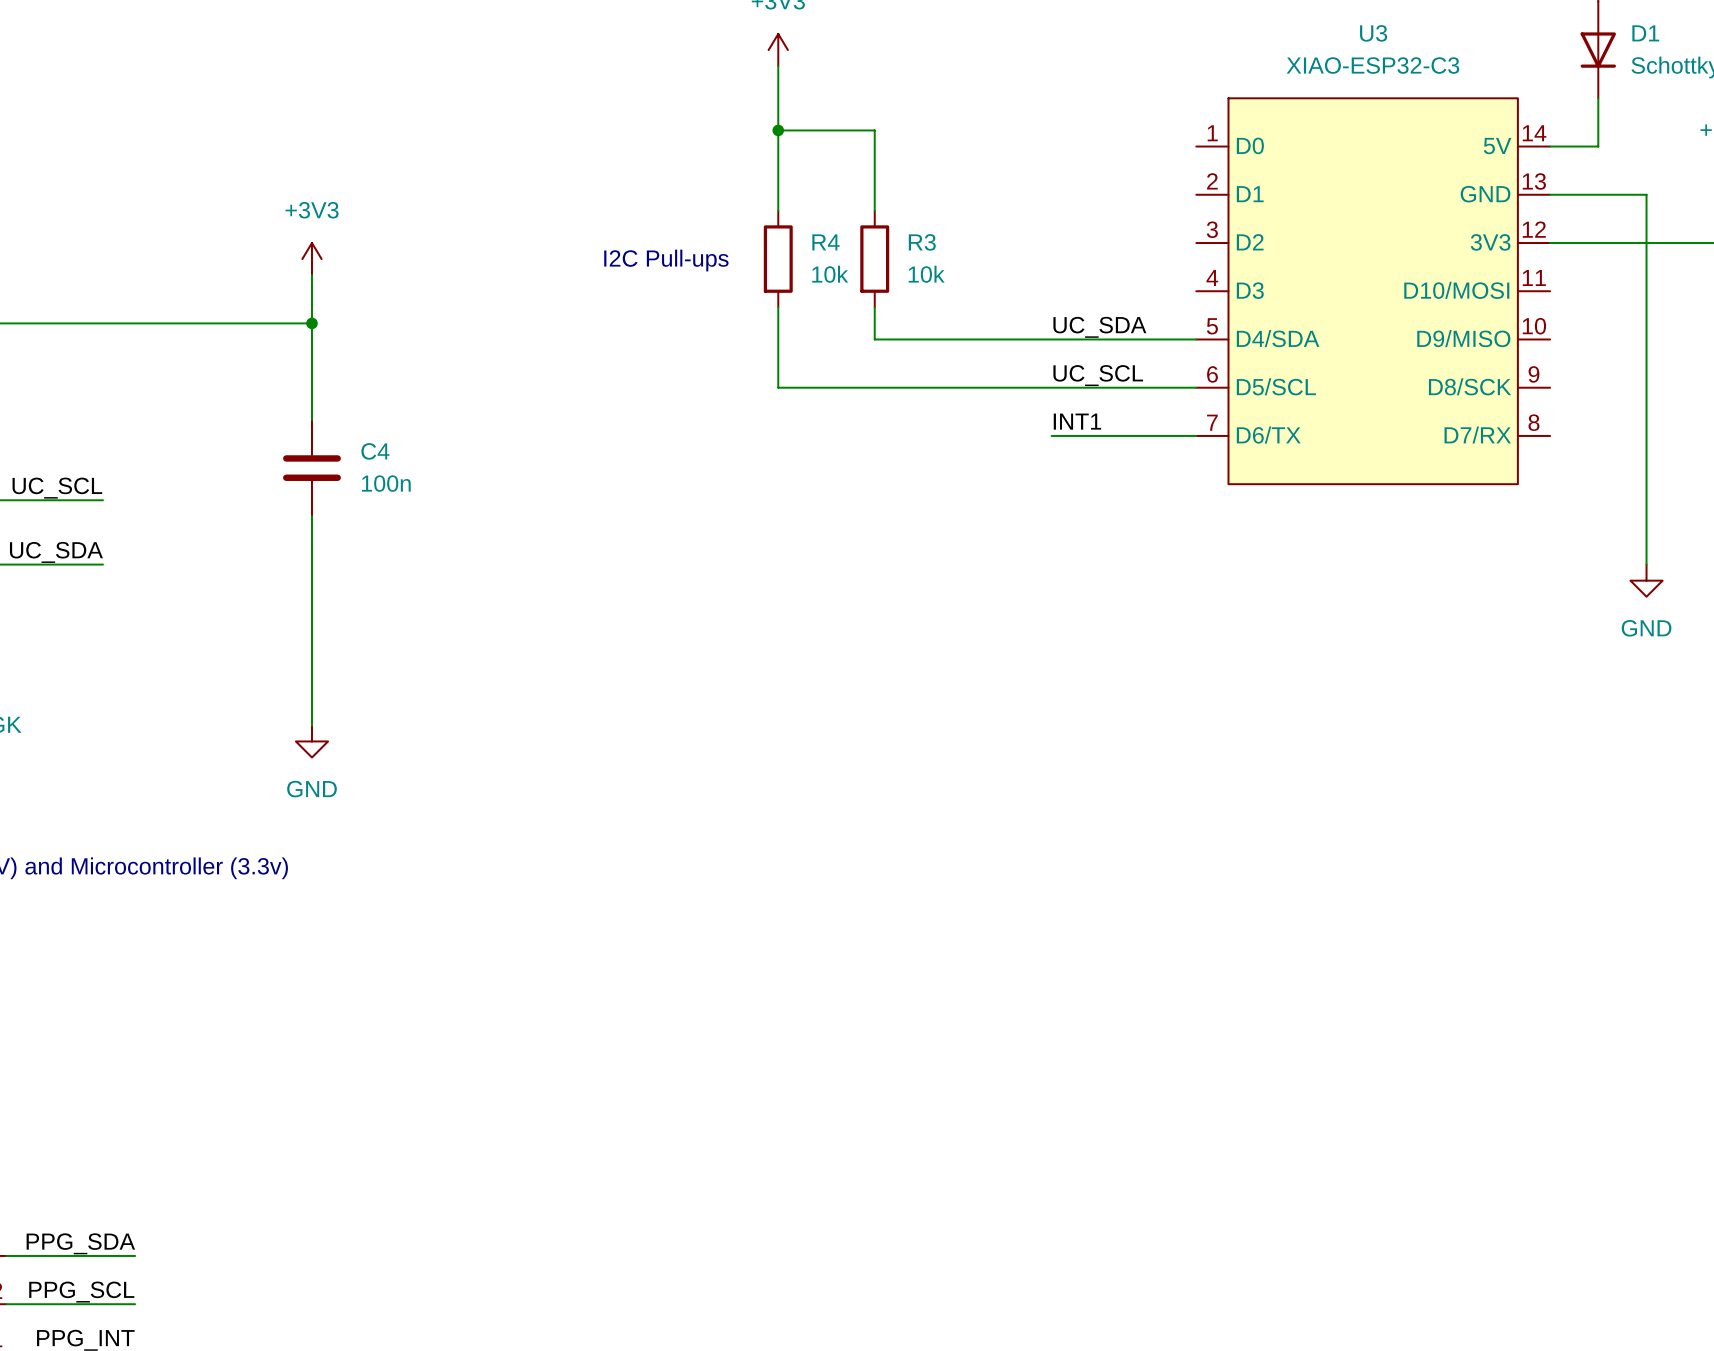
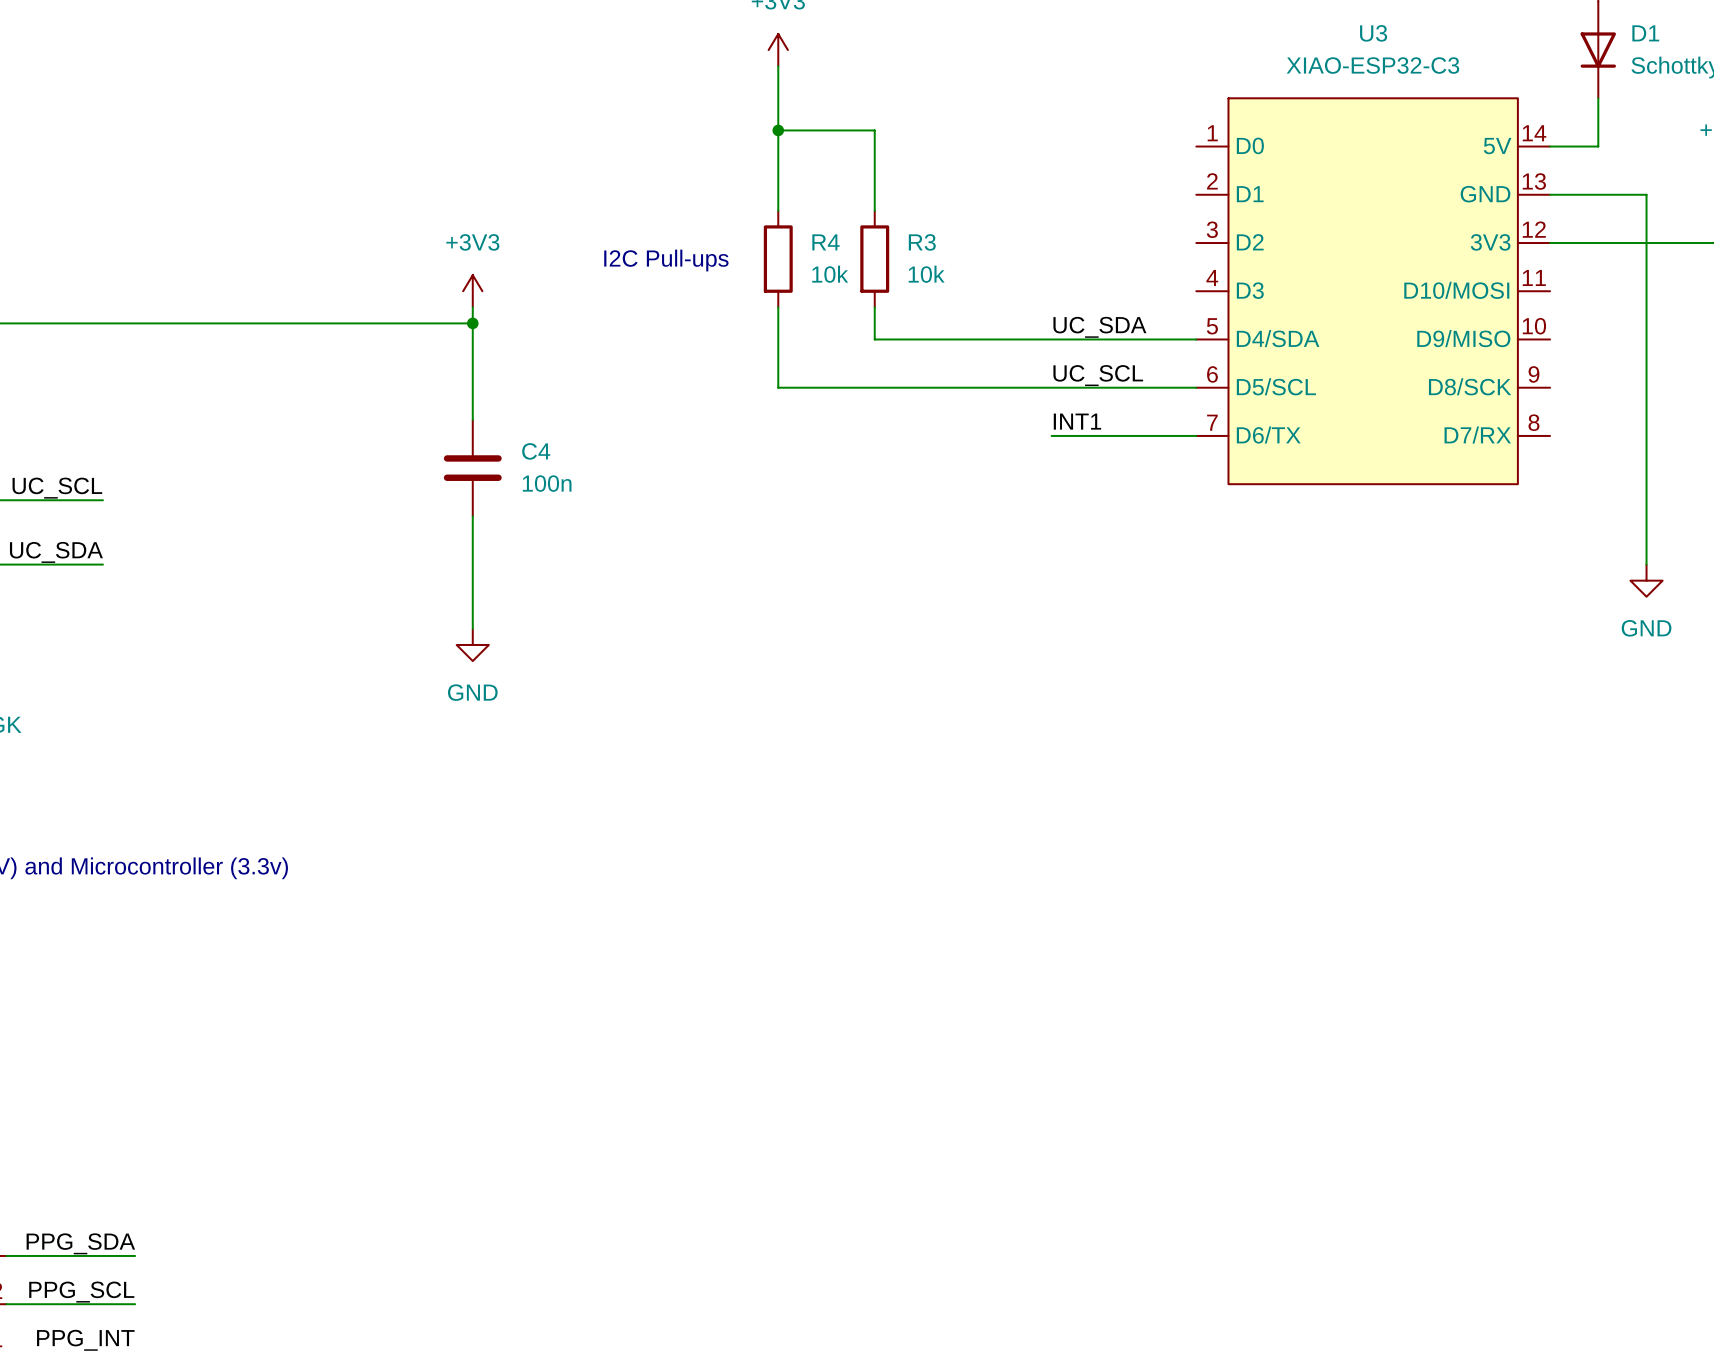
power symbol position: +3V3 (311, 259) -> +3V3 (472, 291)
wire: (311, 275) (311, 419) -> none
wire: none -> (472, 307) (472, 419)
wire: none -> (311, 323) (472, 323)
junction: (311, 323) -> none
junction: none -> (472, 323)
C4 position: (311, 468) -> (472, 468)
wire: (311, 516) (311, 725) -> none
wire: none -> (472, 516) (472, 628)
power symbol position: GND (311, 741) -> GND (472, 644)

